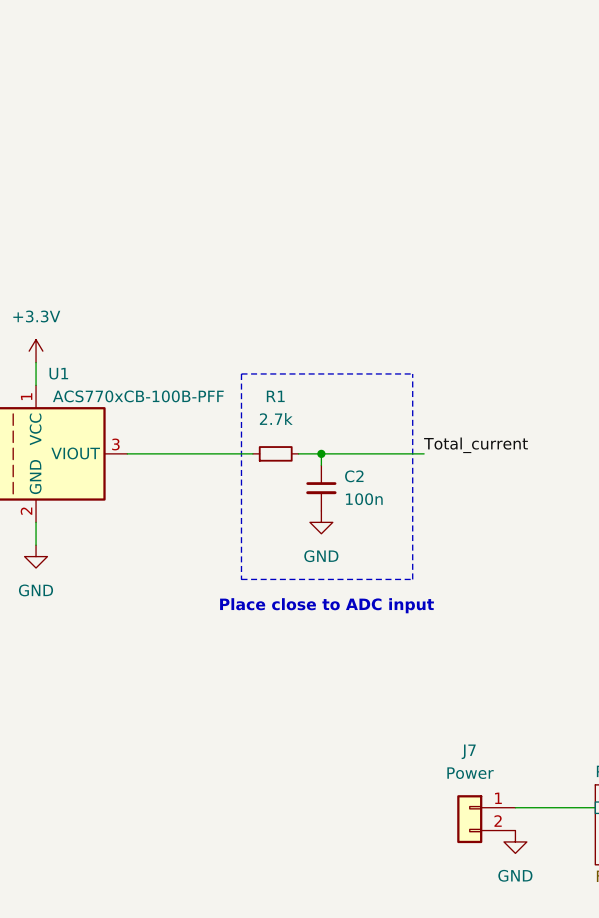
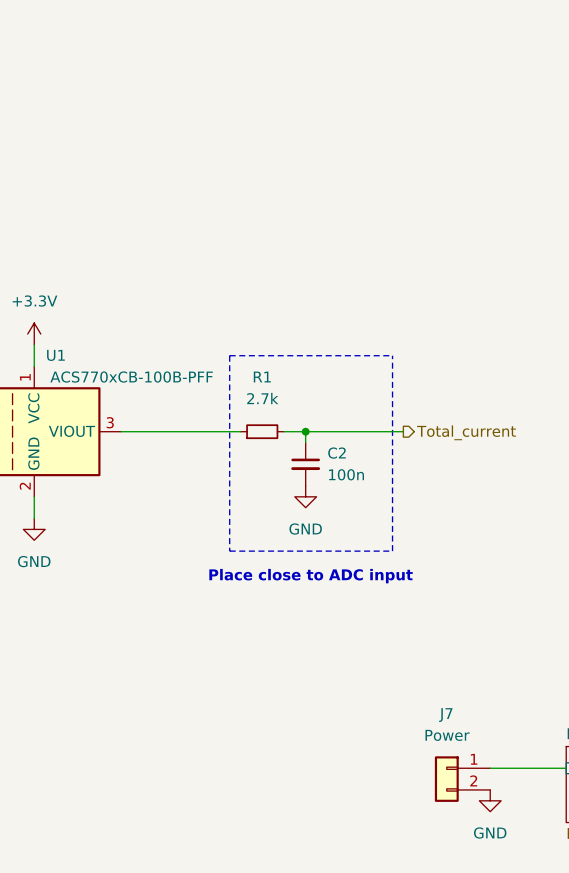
label: Total_current (475, 445) -> none
hierarchical label: none -> Total_current (466, 432)

